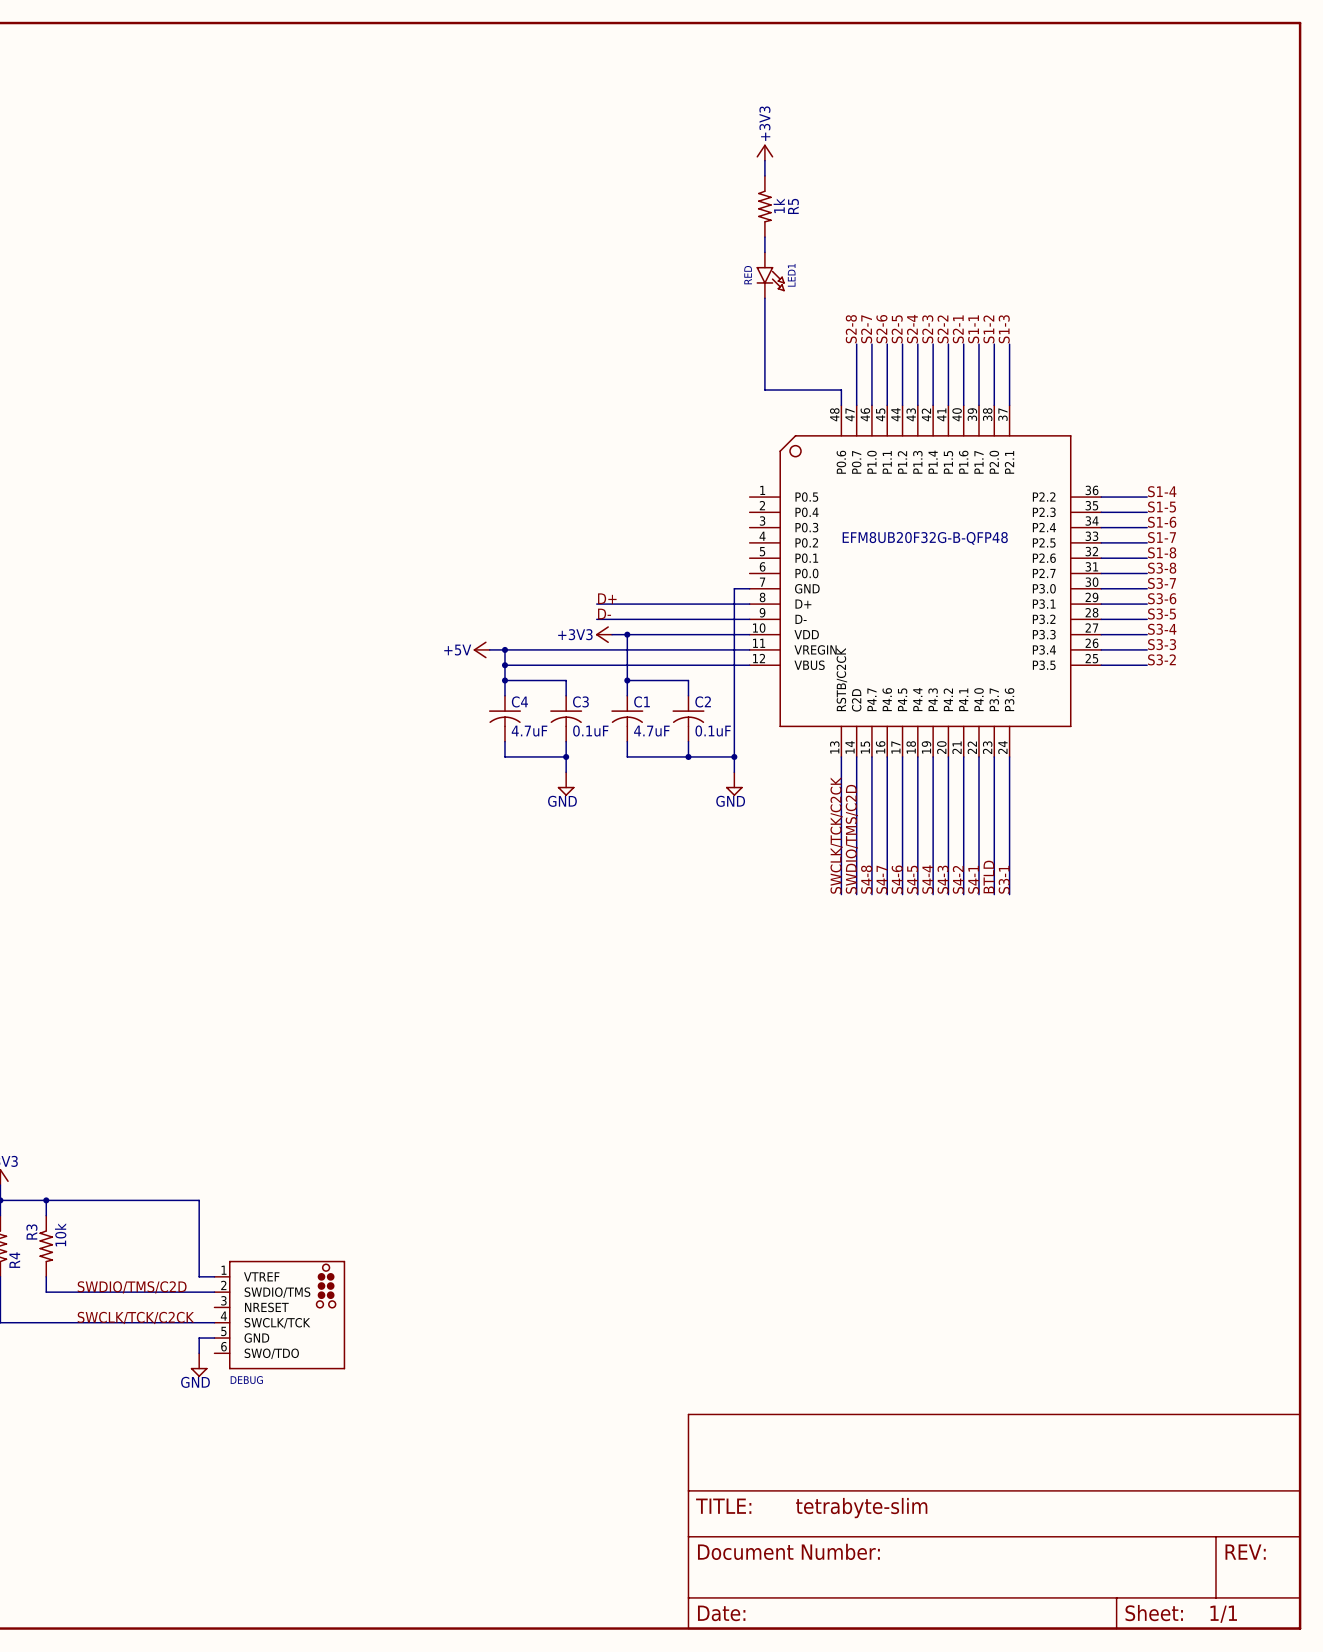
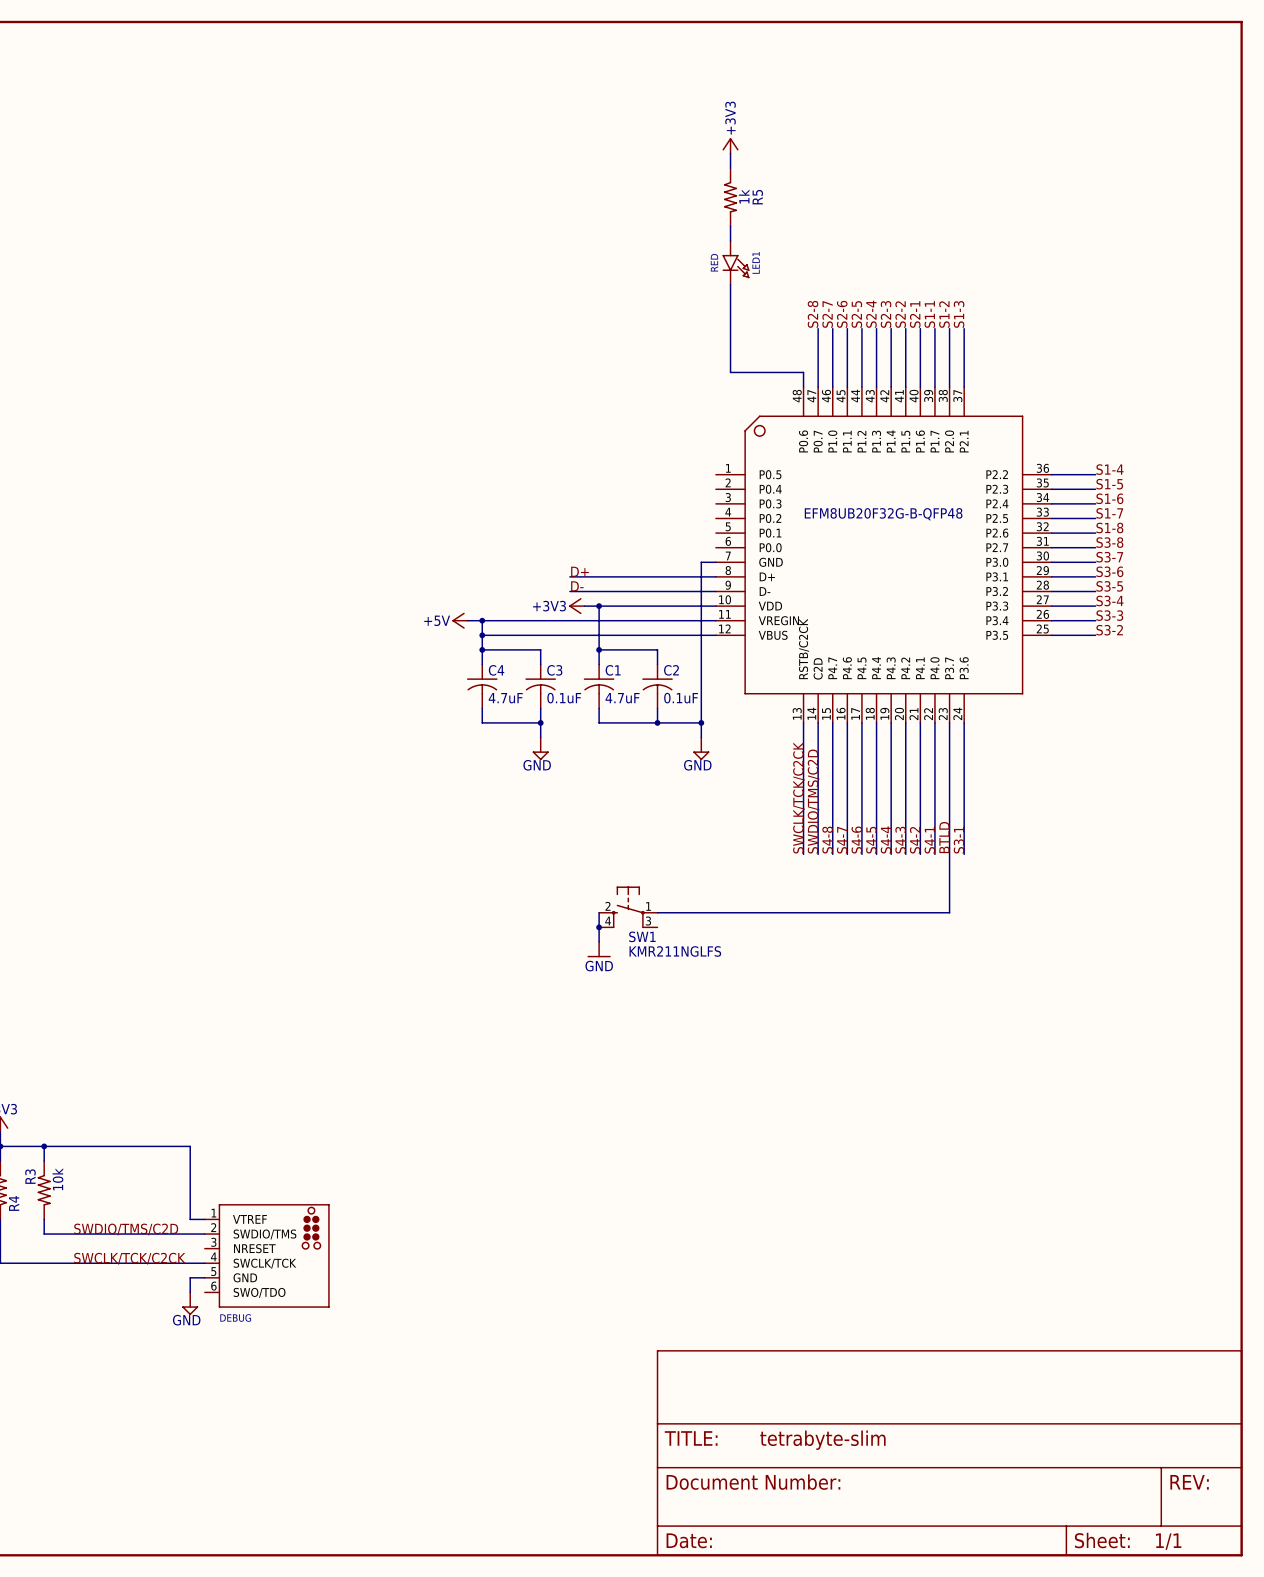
wire: none -> (949, 854) (949, 912) (657, 912)
SW1: none -> KMR211NGLFS (628, 907)
wire: none -> (599, 912) (599, 941)
junction: none -> (599, 927)
power symbol: none -> GND (599, 949)

